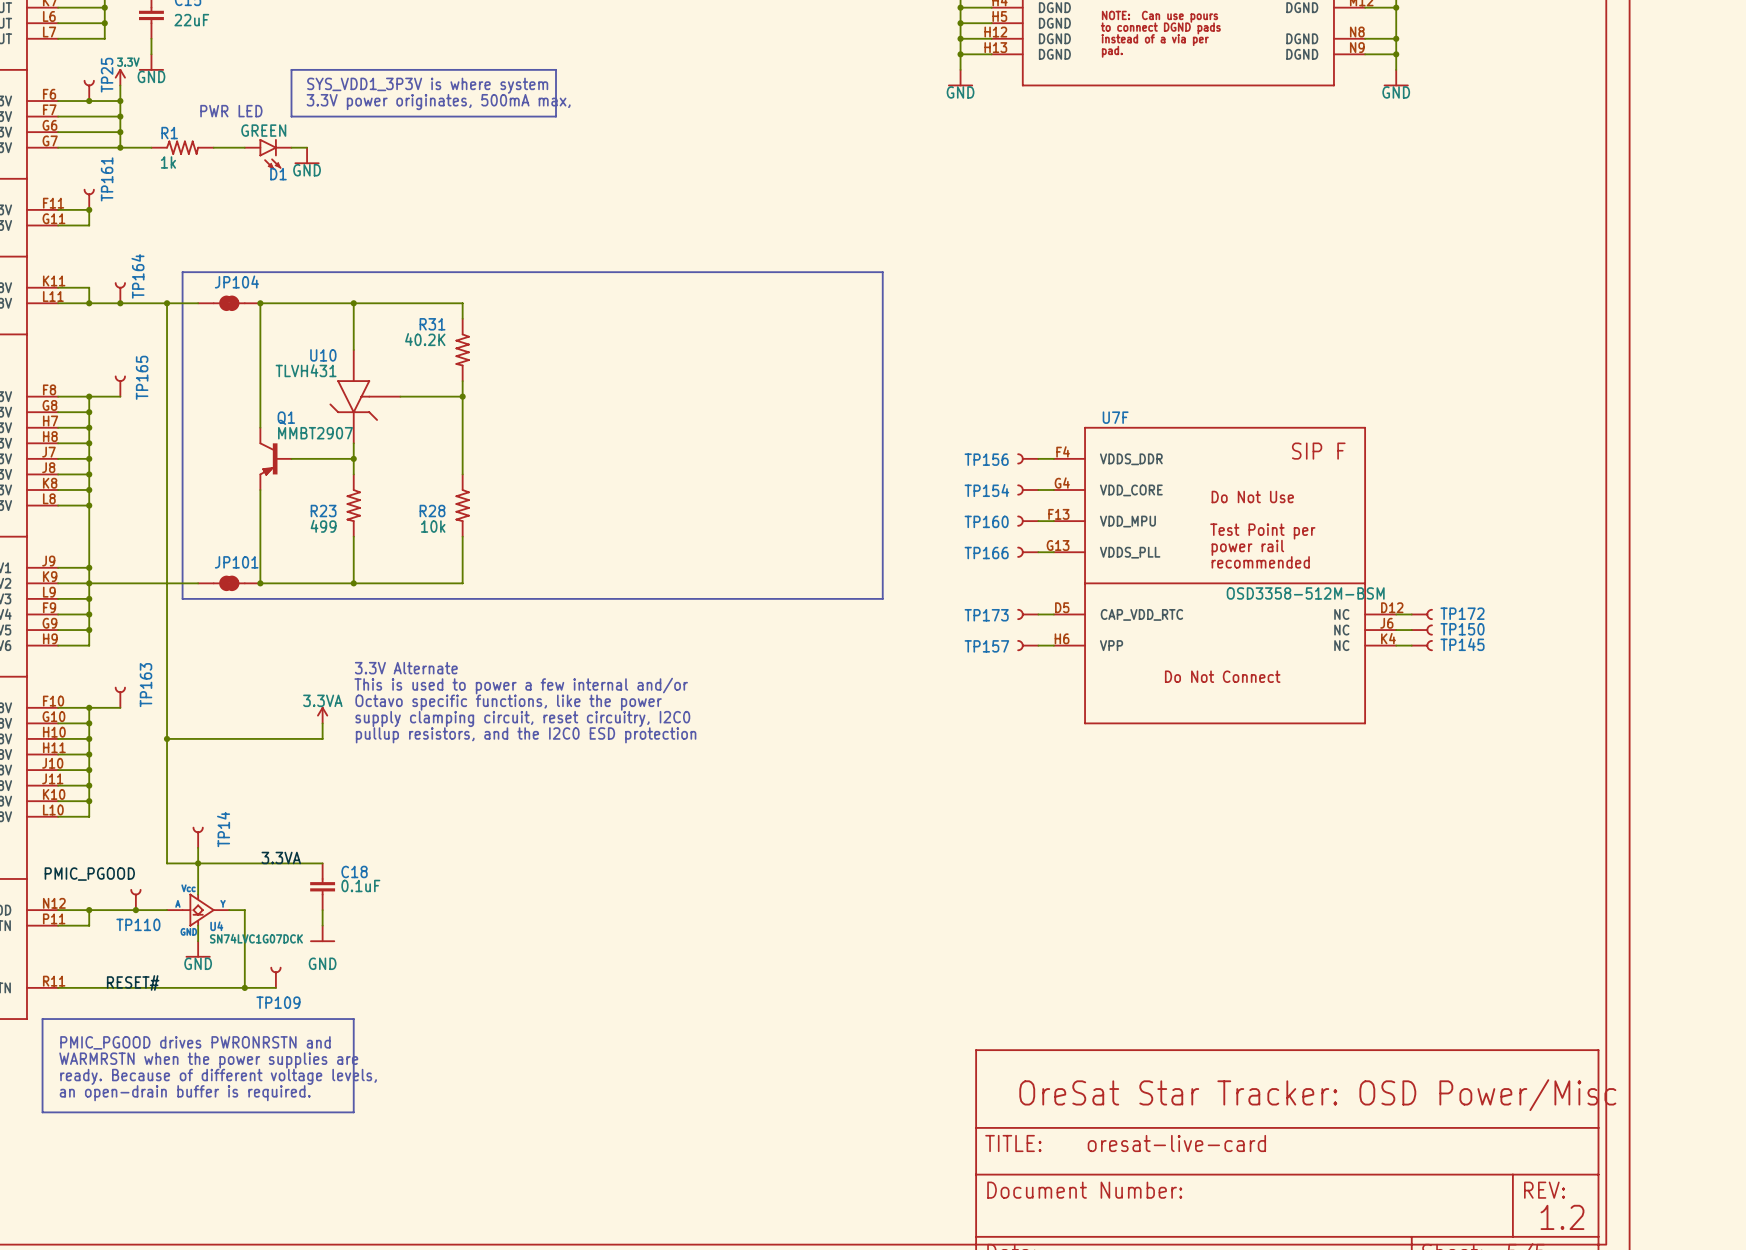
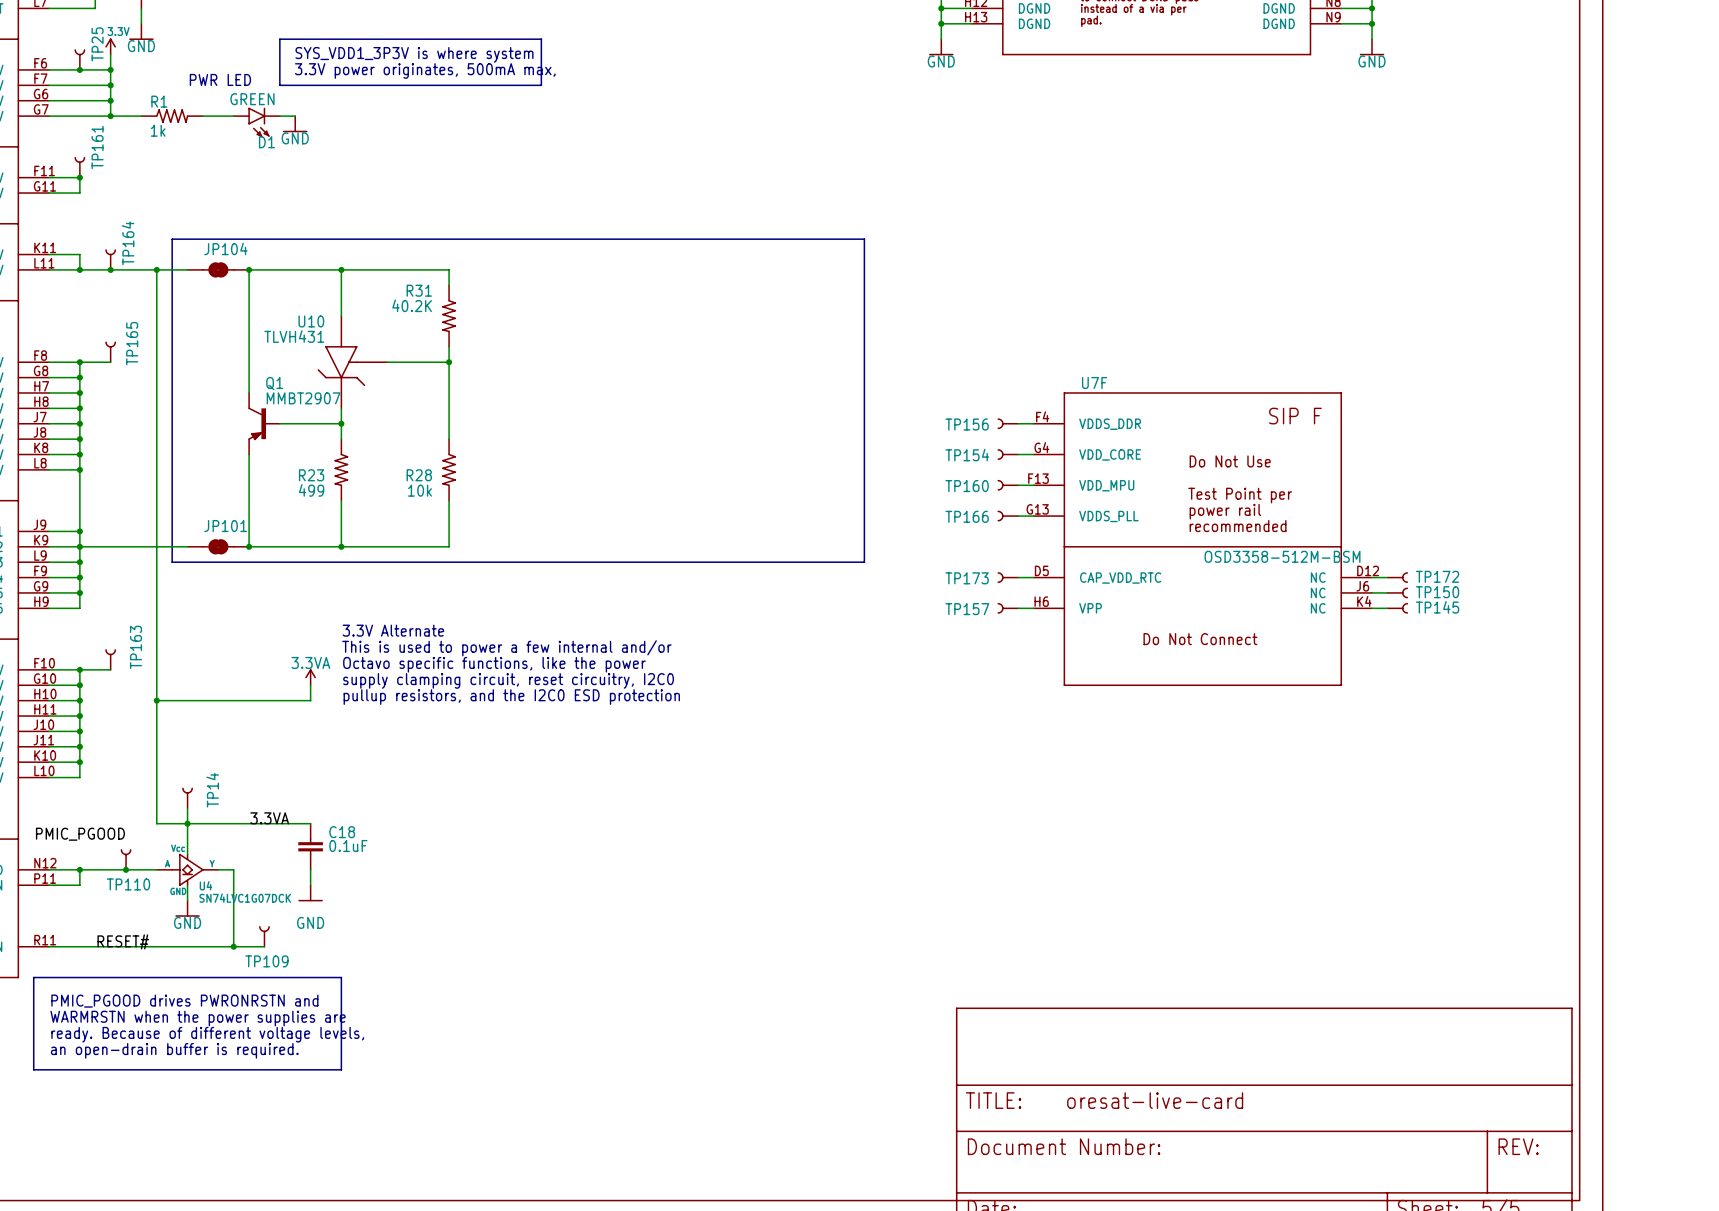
text: OreSat Star Tracker: OSD Power/Misc (1317, 1095) -> none
text: 1.2 (1562, 1217) -> none

